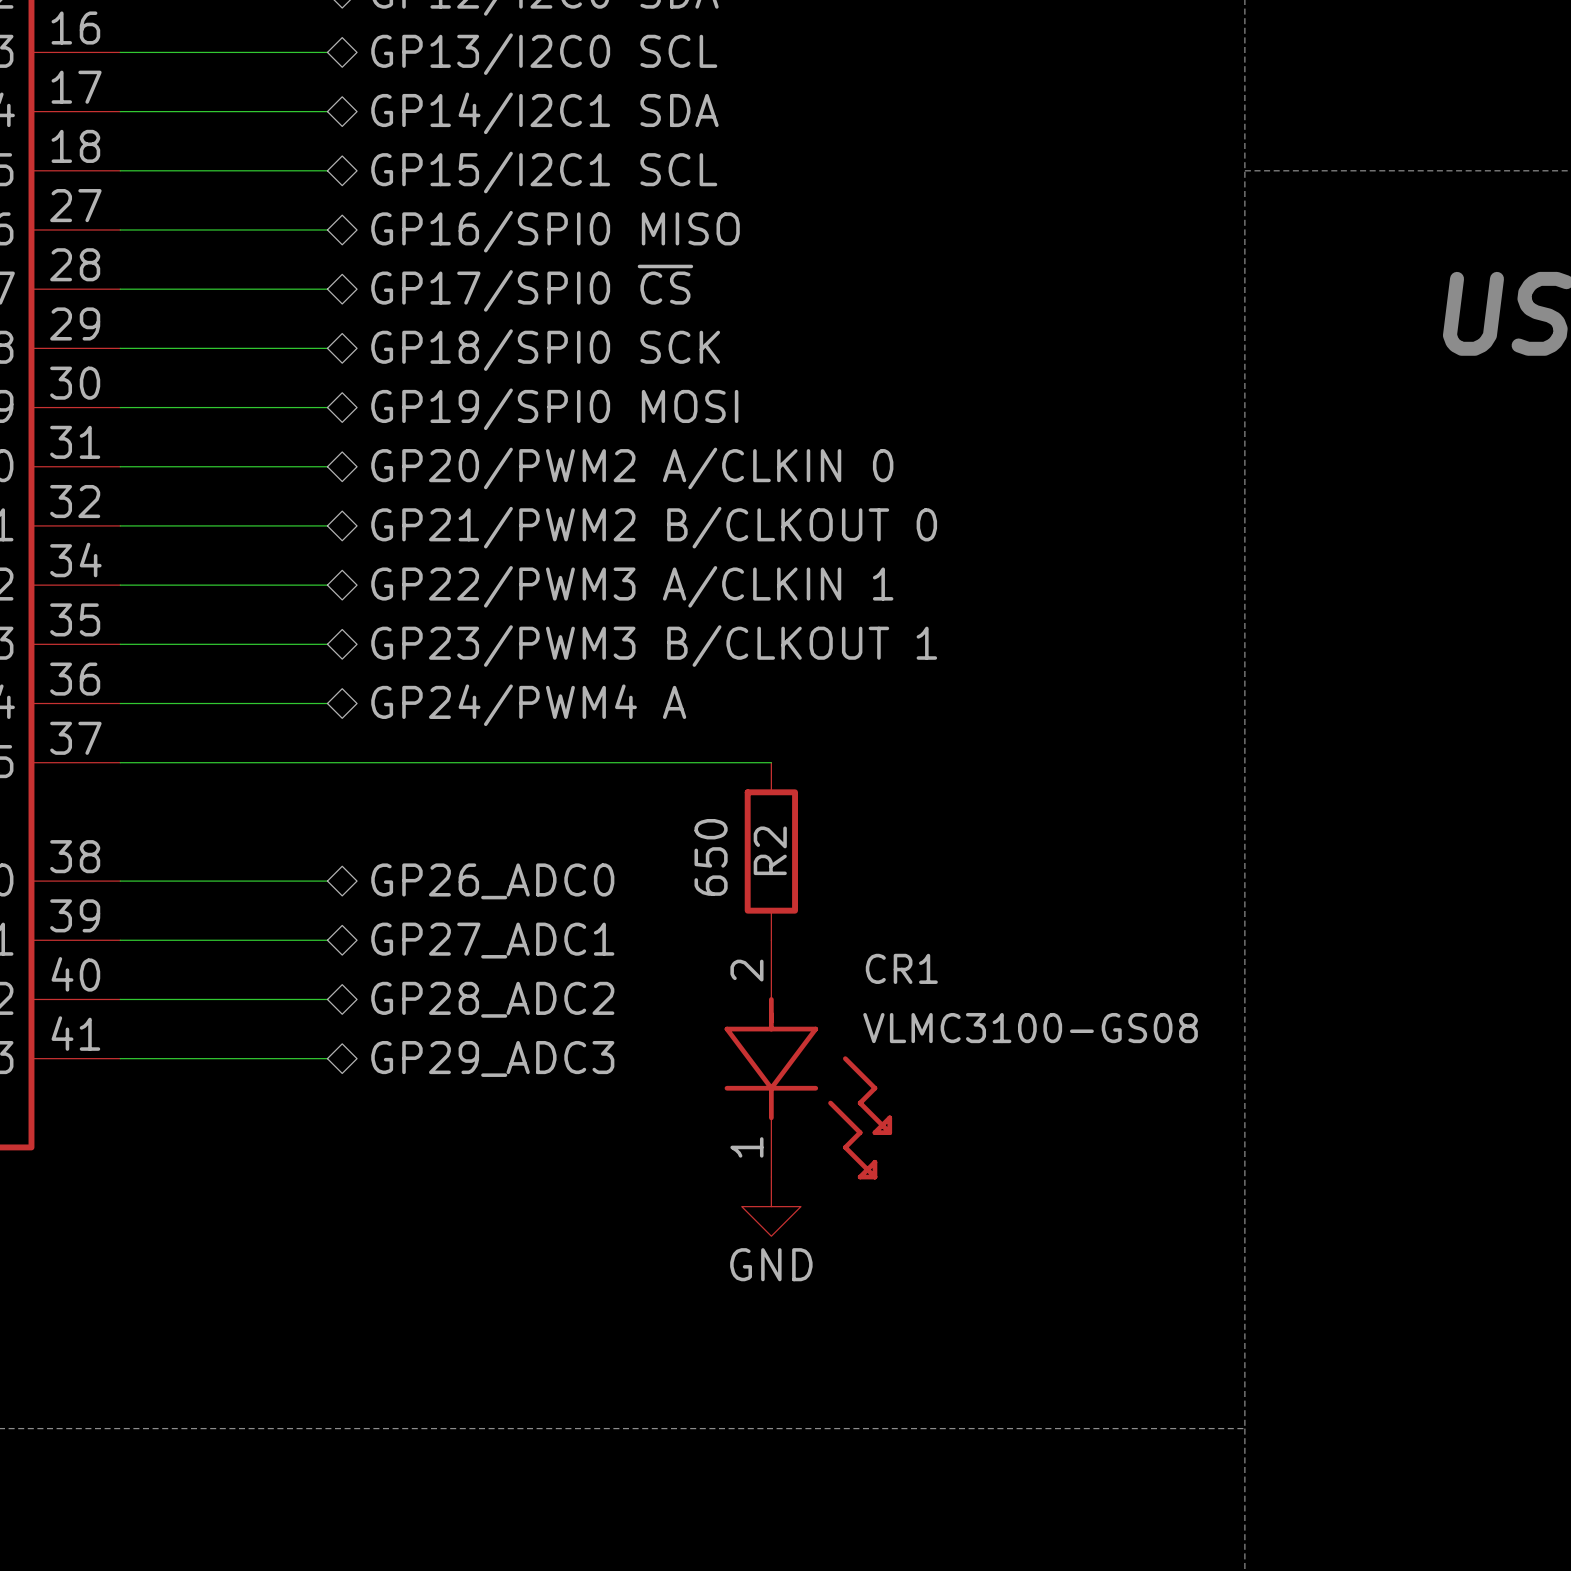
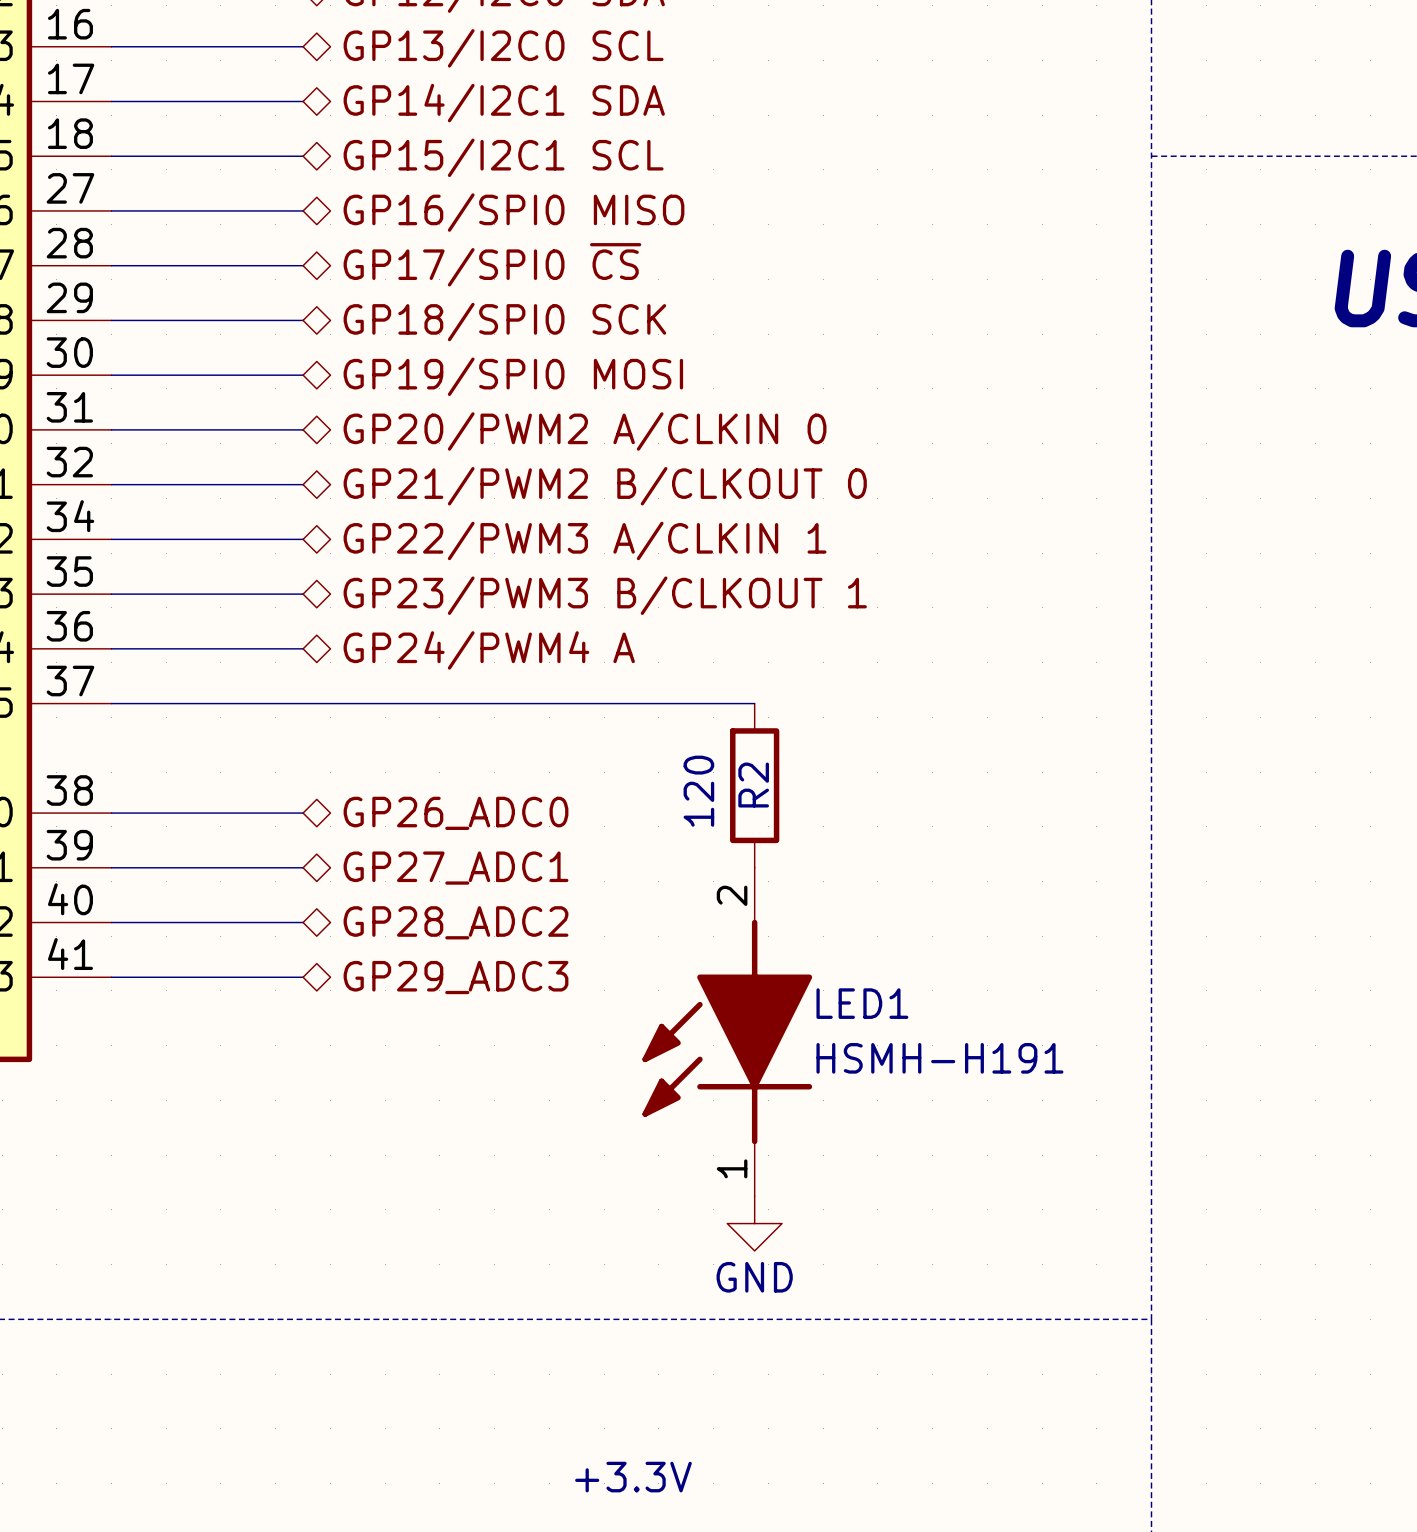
wire: none -> (713, 703) (754, 703)
R2 position: (771, 851) -> (754, 785)
R2 value: 650 (711, 857) -> 120 (698, 791)
CR1: VLMC3100-GS08 (808, 1059) -> none
LED1: none -> HSMH-H191 (727, 1031)
power symbol position: GND (771, 1206) -> GND (754, 1223)

